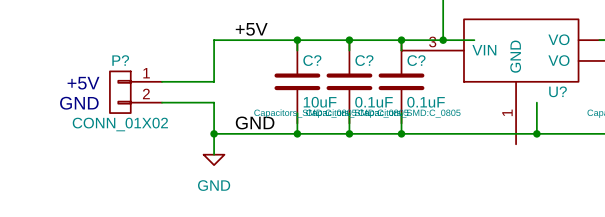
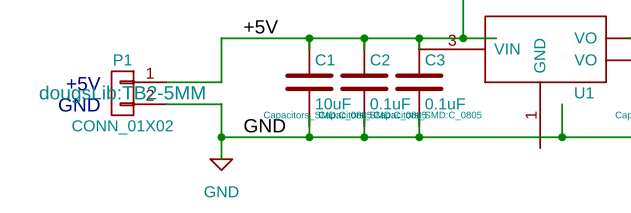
P? name: P? (120, 60) -> P1 (122, 59)
C? name: C? (312, 60) -> C1 (325, 59)
C? name: C? (364, 60) -> C2 (380, 59)
C? name: C? (416, 60) -> C3 (435, 59)
U? name: U? (558, 91) -> U1 (584, 92)
P? text: none -> dougsLib:TB2-5MM (122, 94)

